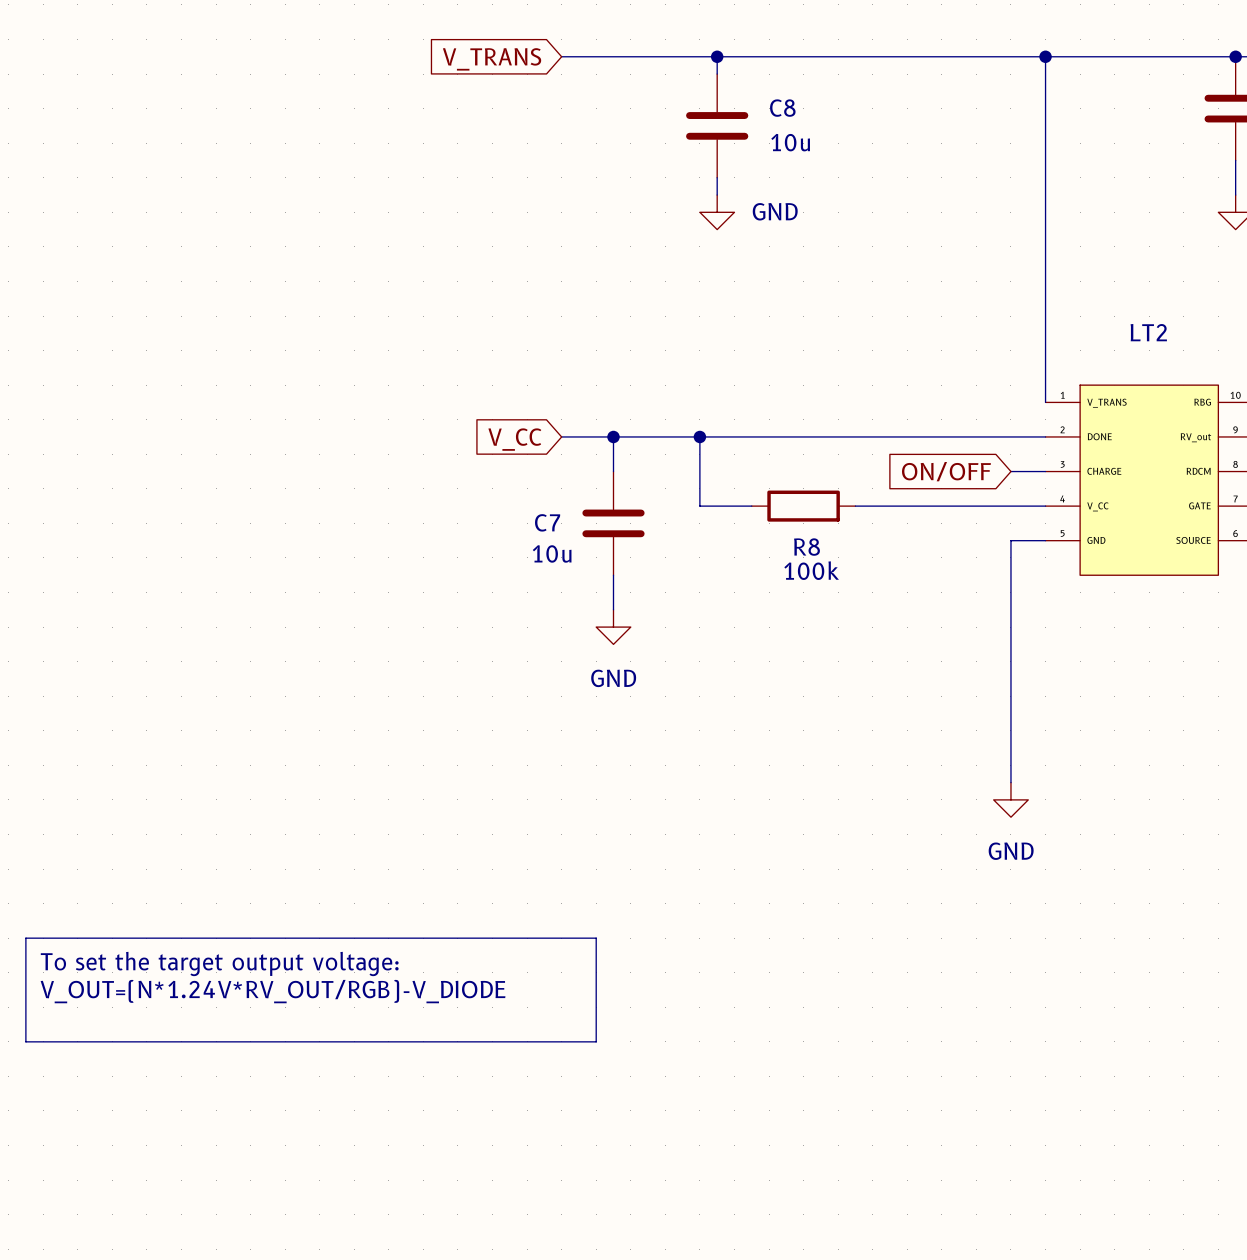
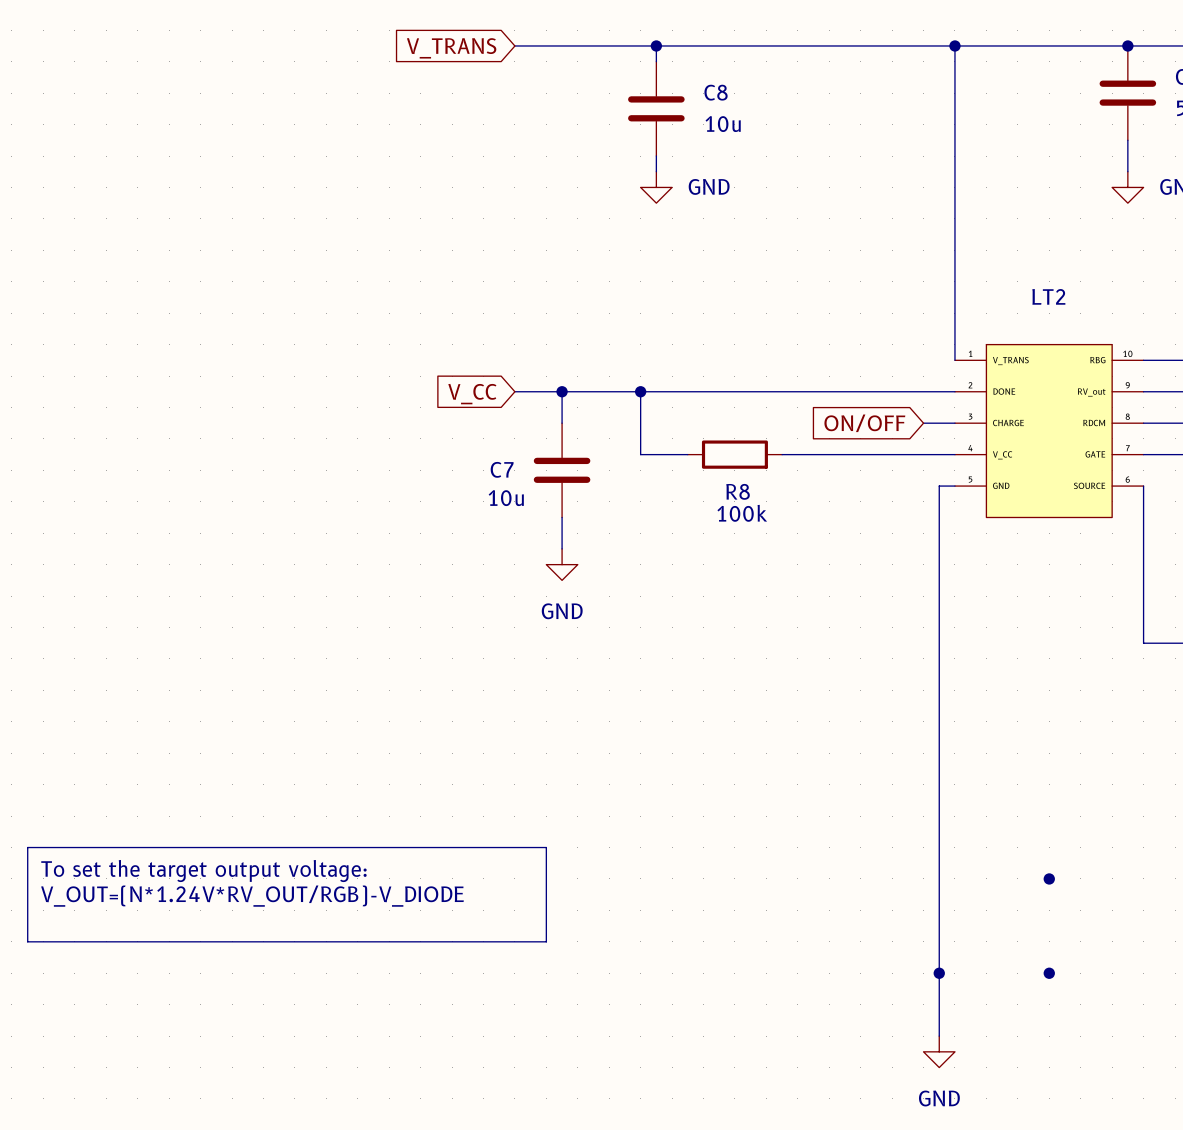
wire: (1028, 540) (1010, 540) (1010, 782) -> (939, 486) (939, 1036)
power symbol: GND (1010, 799) -> none
junction: none -> (1049, 878)
junction: none -> (939, 973)
junction: none -> (1049, 973)
power symbol: none -> GND (939, 1051)

